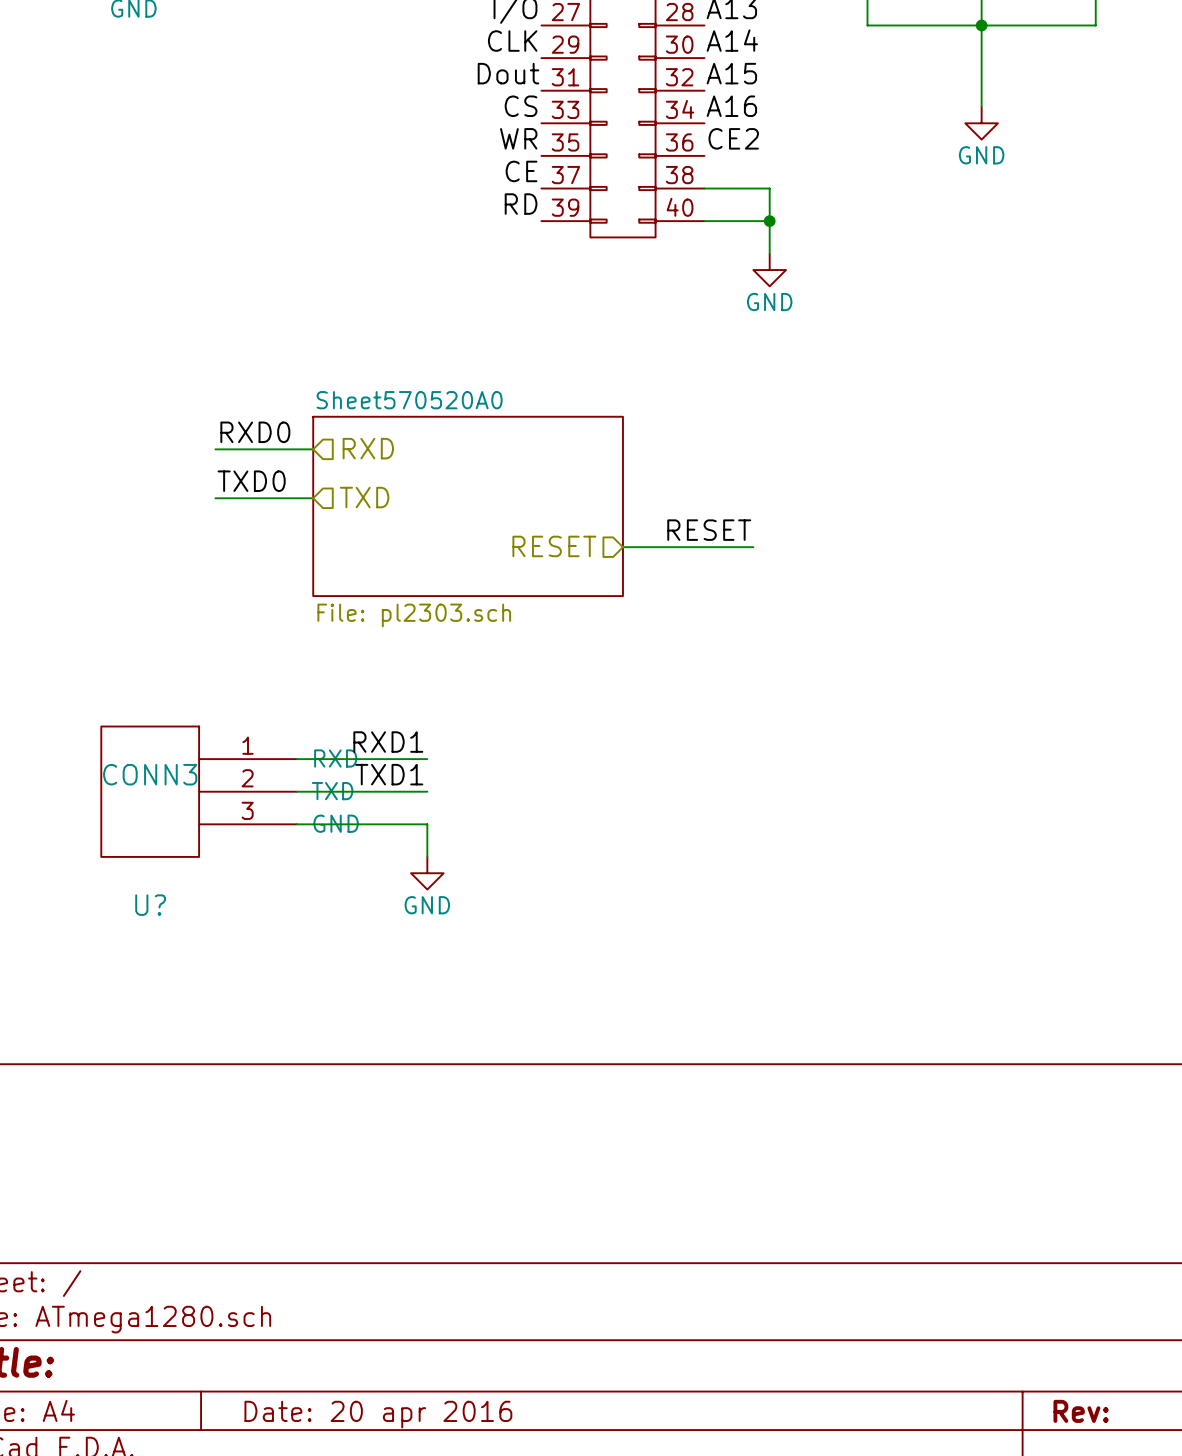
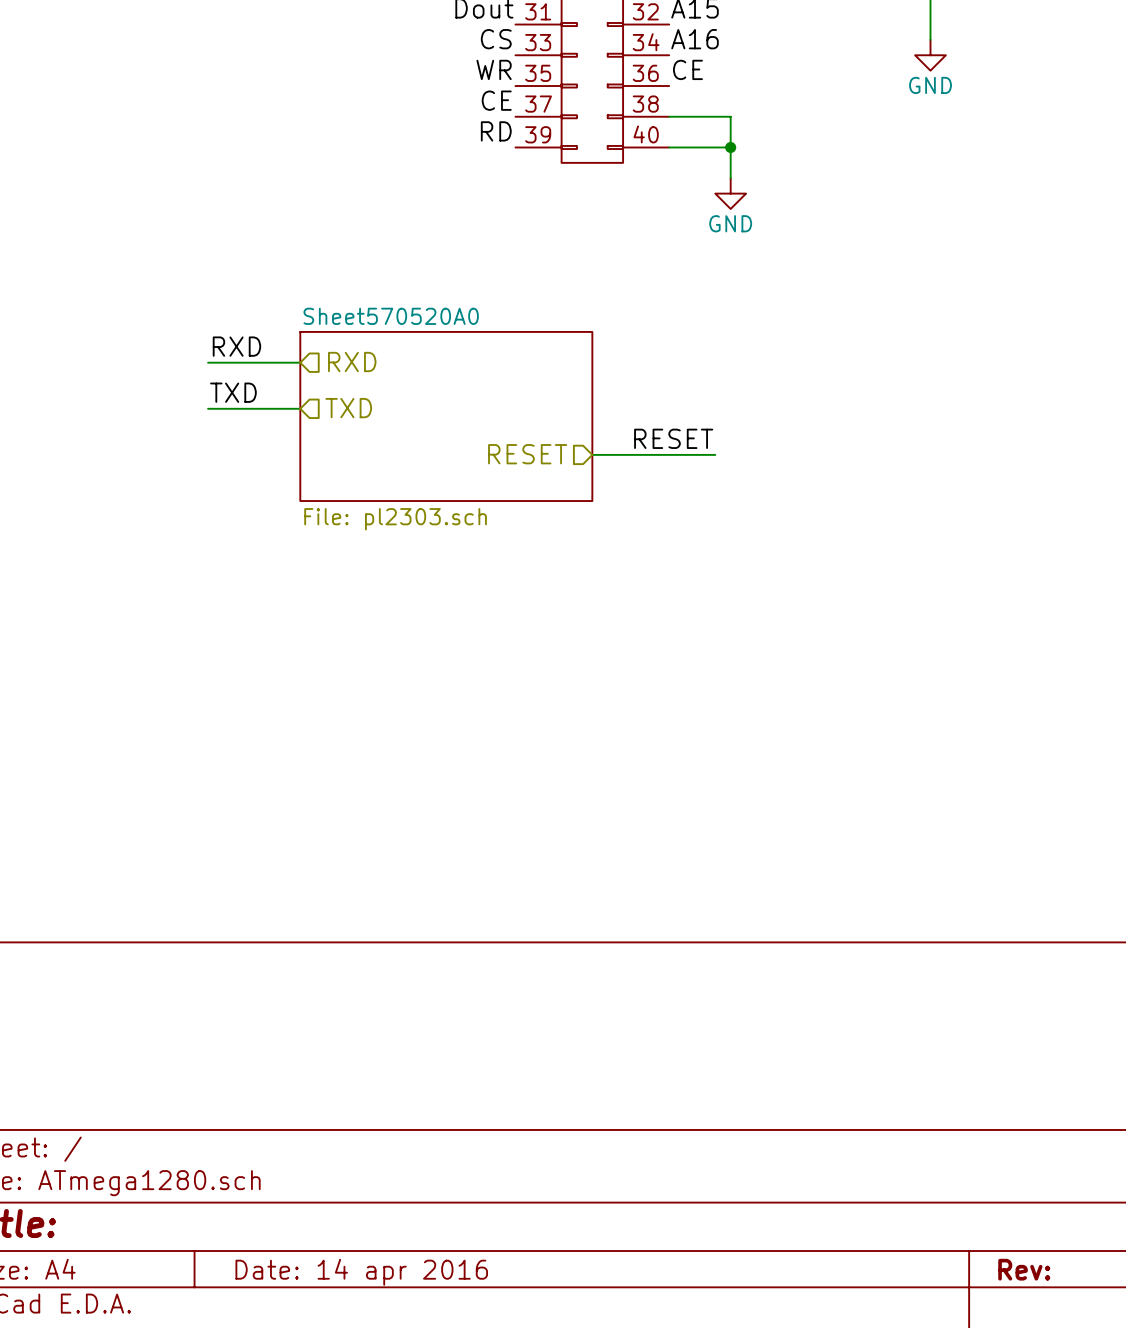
label: CE2 (733, 138) -> CE (687, 69)
label: RXD0 (255, 432) -> RXD (236, 346)
label: TXD0 (251, 481) -> TXD (233, 392)
label: RXD1 (388, 742) -> none
wire: (296, 759) (427, 759) -> none
label: TXD1 (389, 774) -> none
U?: CONN3 (199, 791) -> none
wire: (296, 791) (427, 791) -> none
wire: (296, 824) (427, 824) (427, 856) -> none
power symbol: GND (427, 873) -> none
title block: Date: 20 apr 2016 (378, 1414) -> Date: 14 apr 2016 (361, 1272)

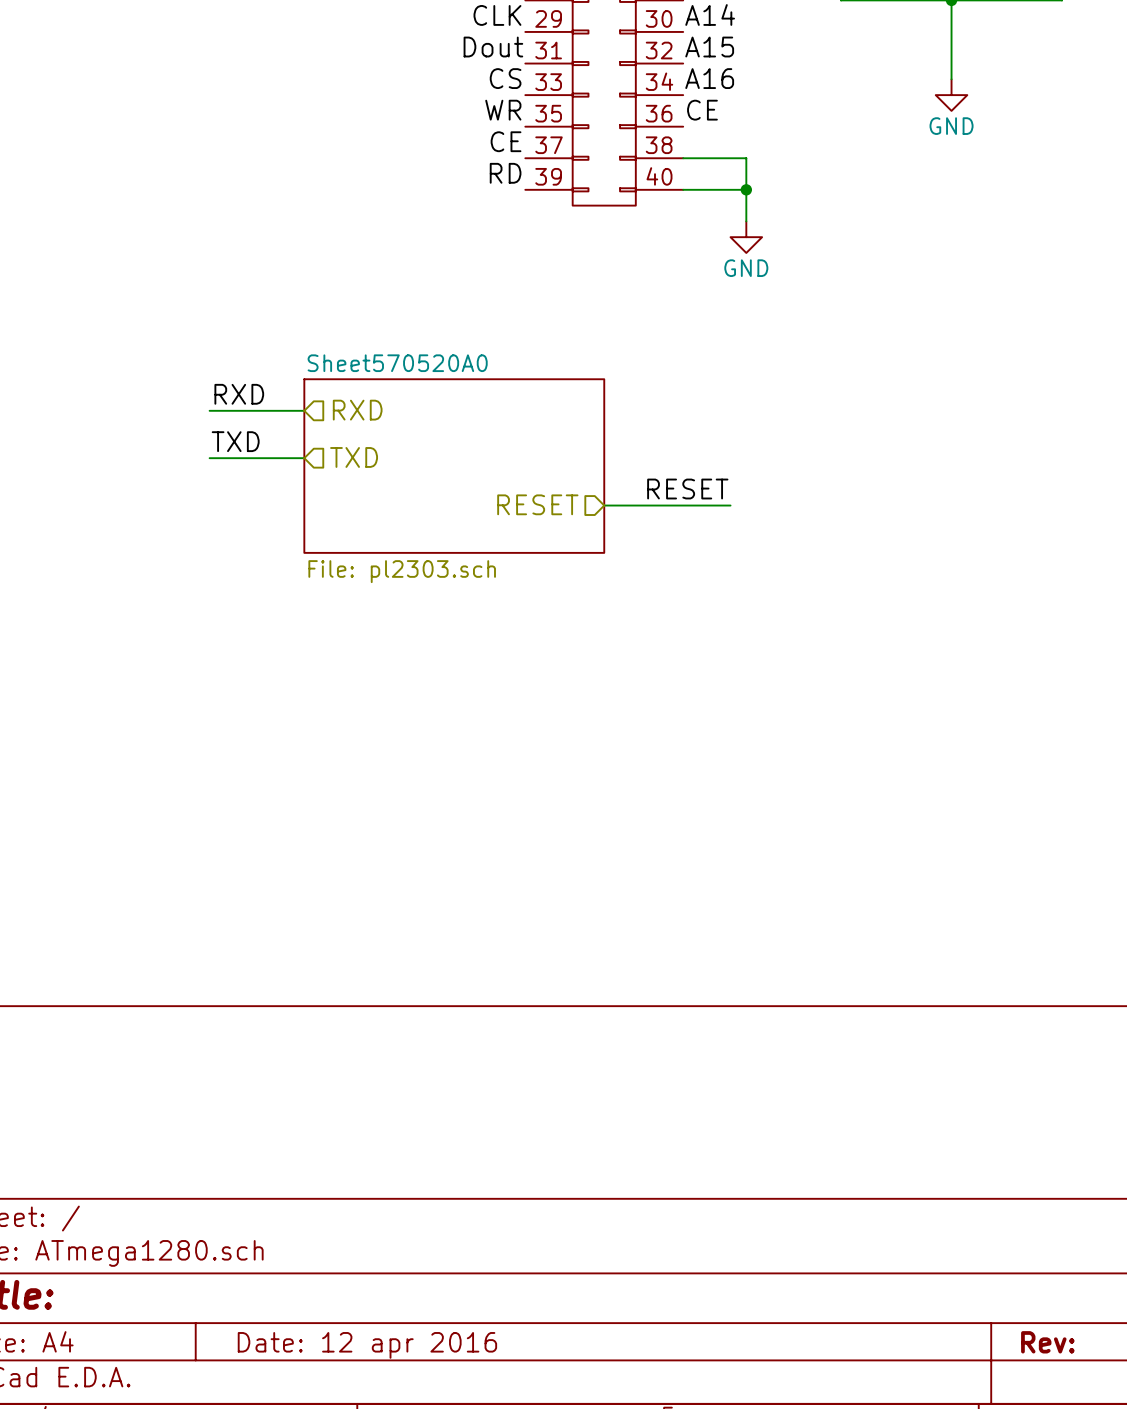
title block: Date: 14 apr 2016 (361, 1272) -> Date: 12 apr 2016 (367, 1345)

